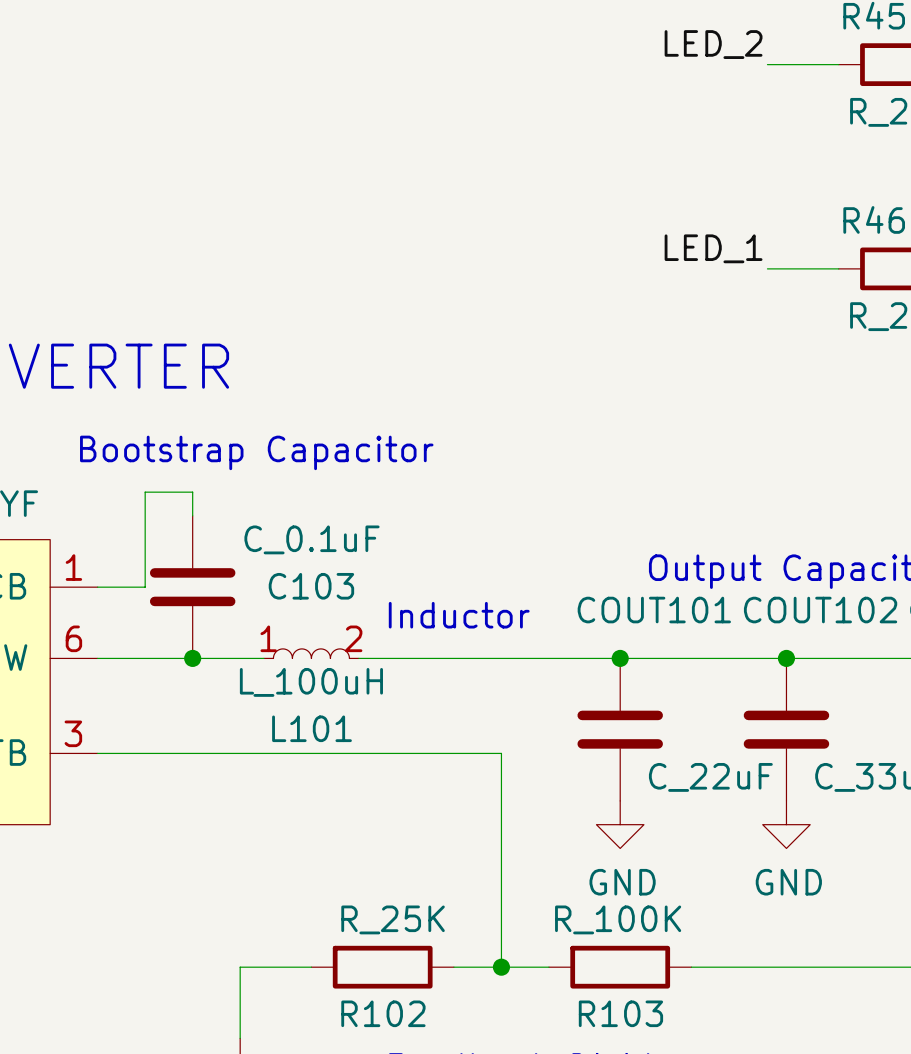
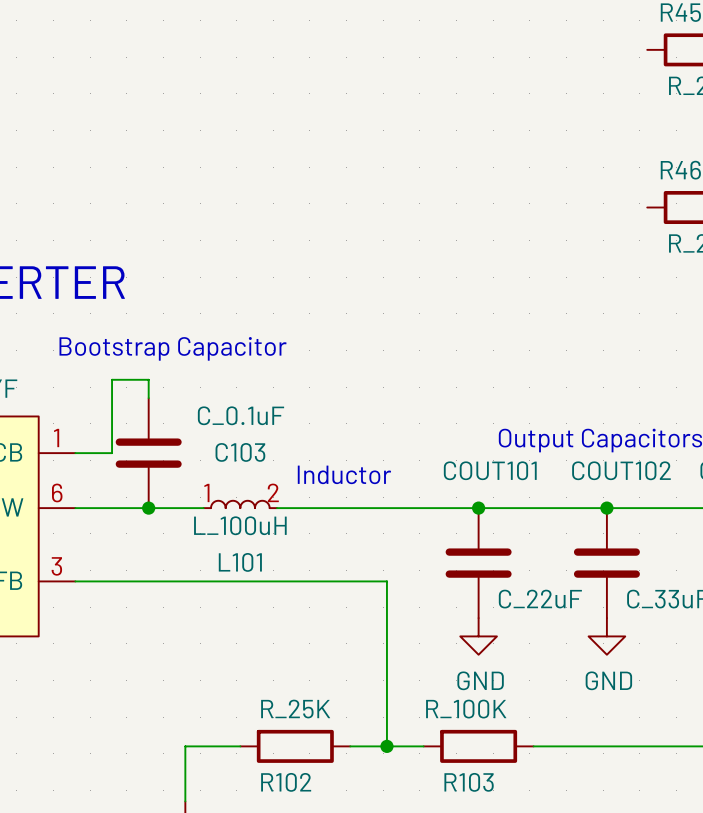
label: LED_2 (713, 44) -> none
wire: (767, 64) (838, 64) -> none
label: LED_1 (713, 248) -> none
wire: (767, 268) (838, 268) -> none

